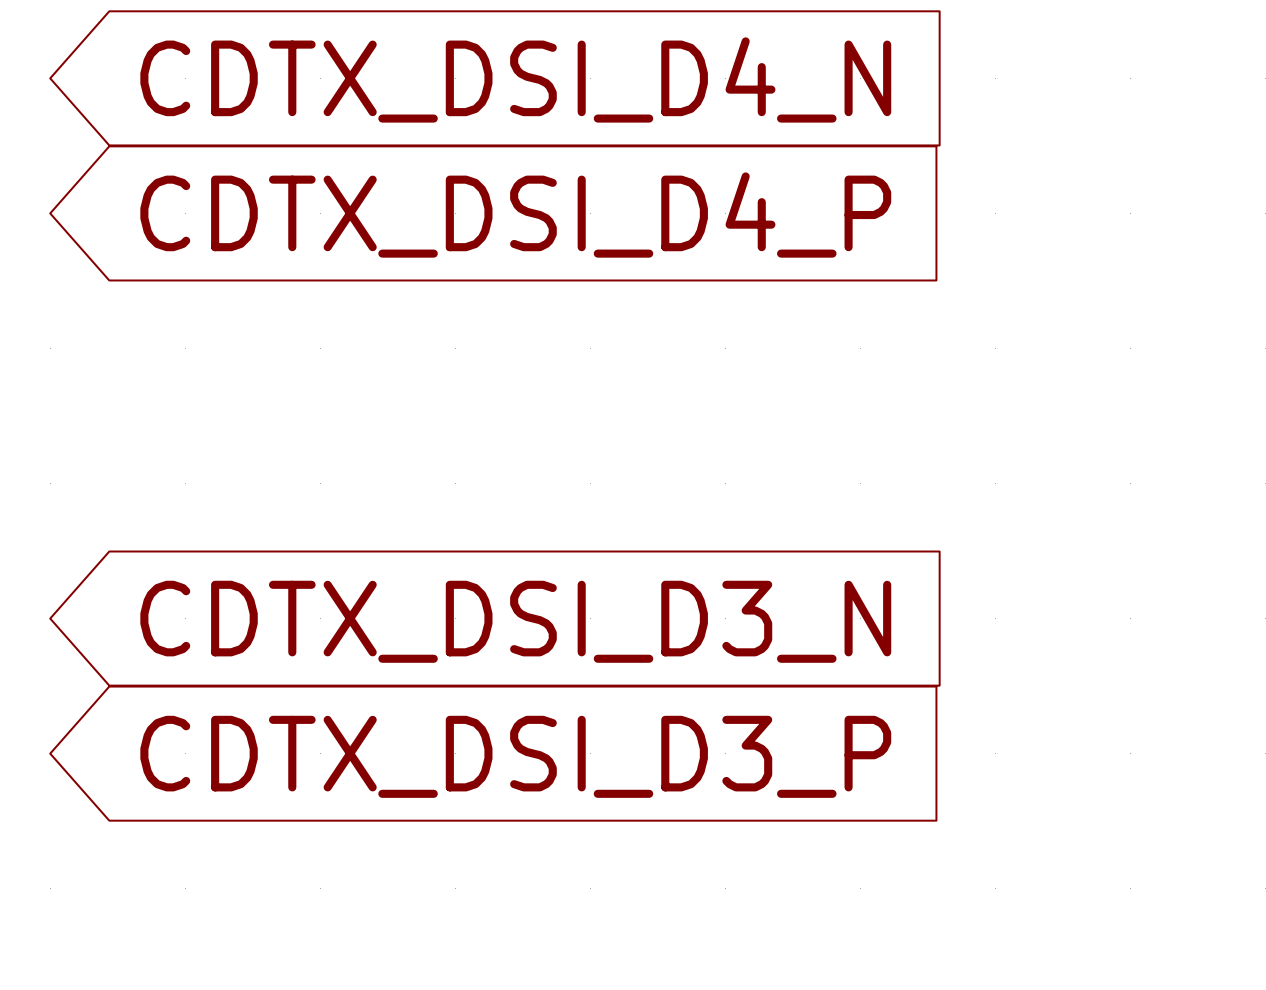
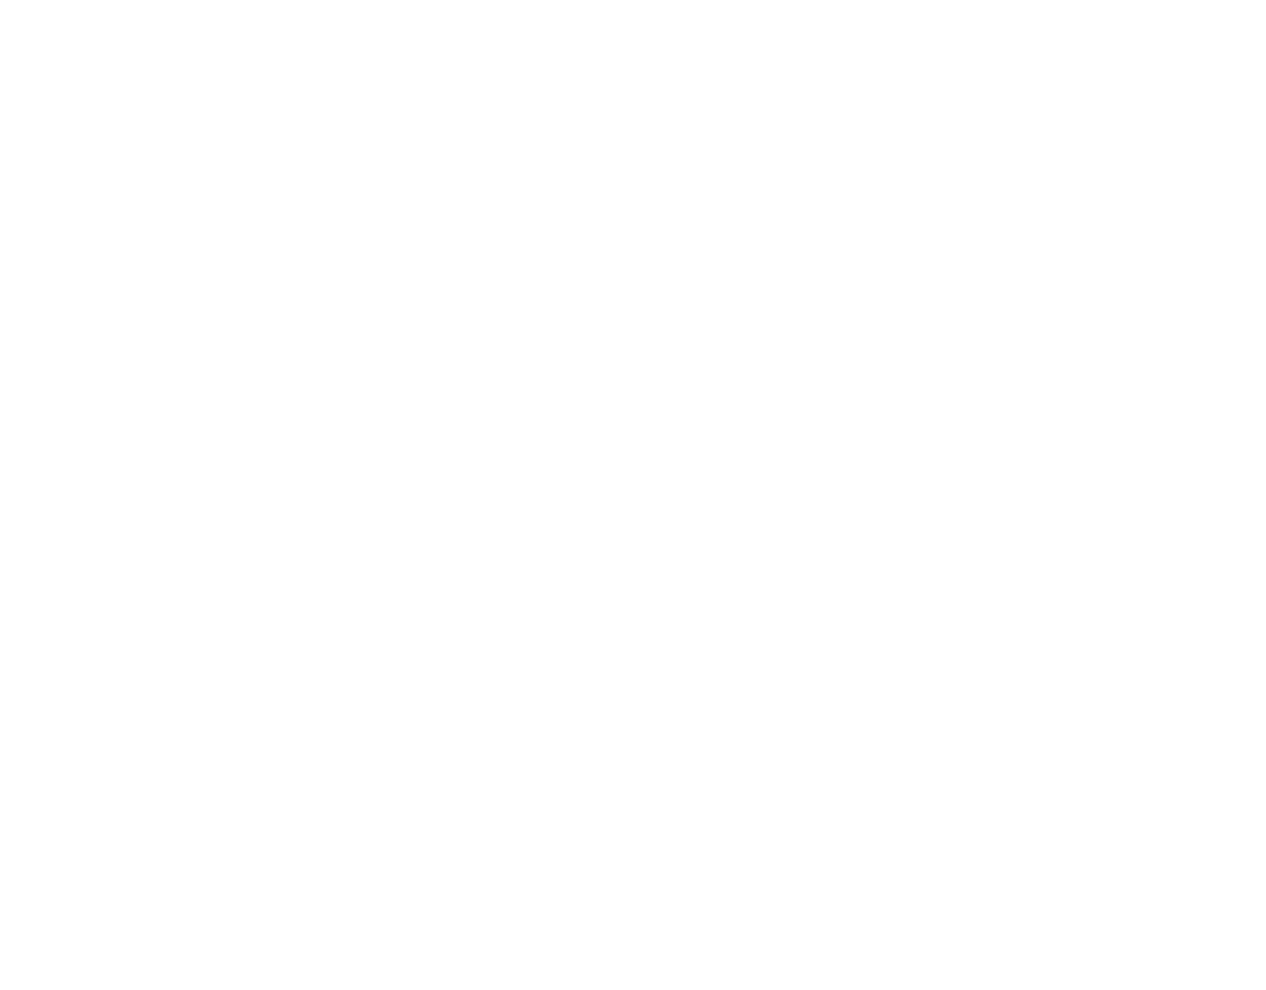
global label: CDTX_DSI_D4_N (515, 79) -> none
global label: CDTX_DSI_D4_P (515, 215) -> none
global label: CDTX_DSI_D3_N (515, 621) -> none
global label: CDTX_DSI_D3_P (515, 756) -> none

